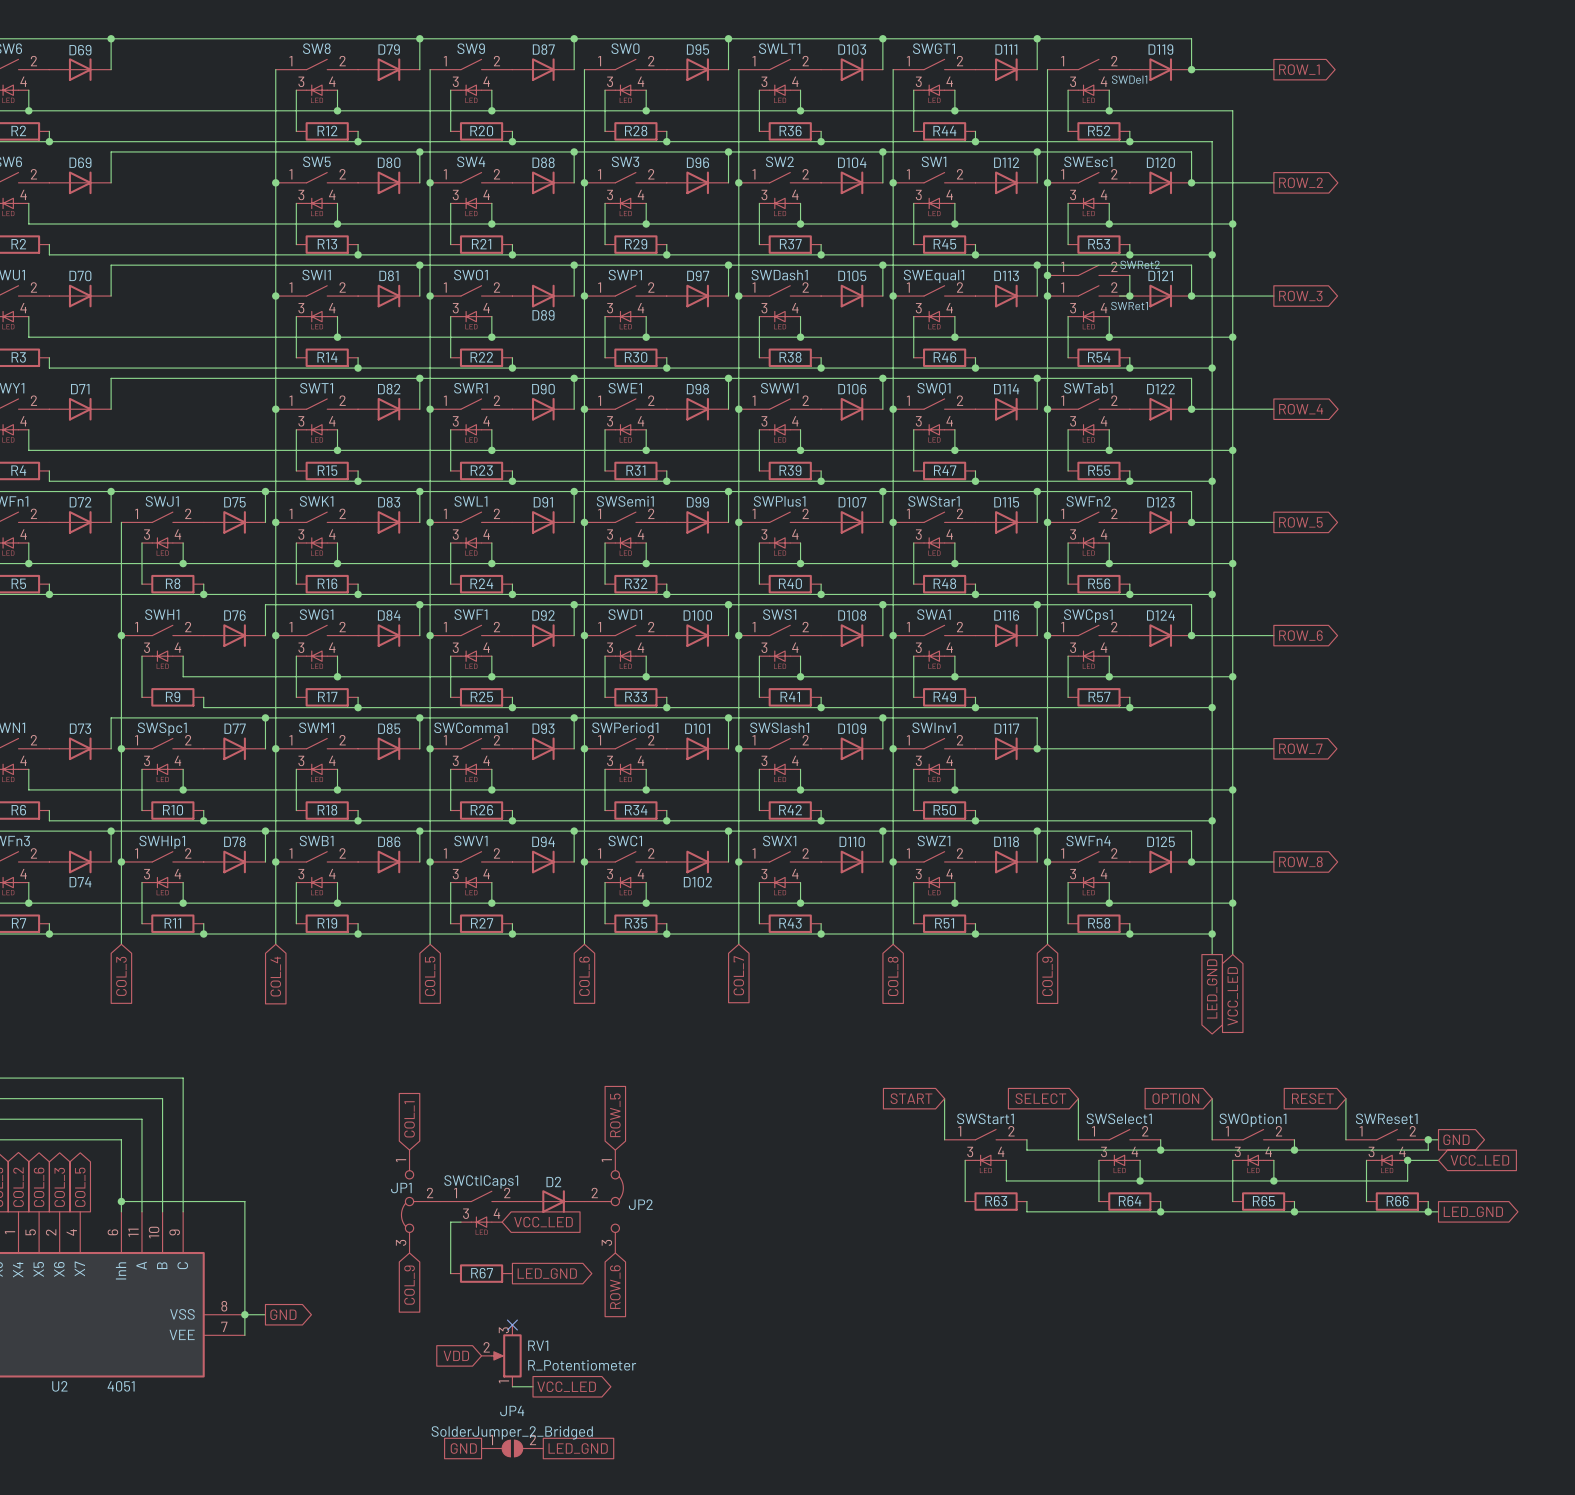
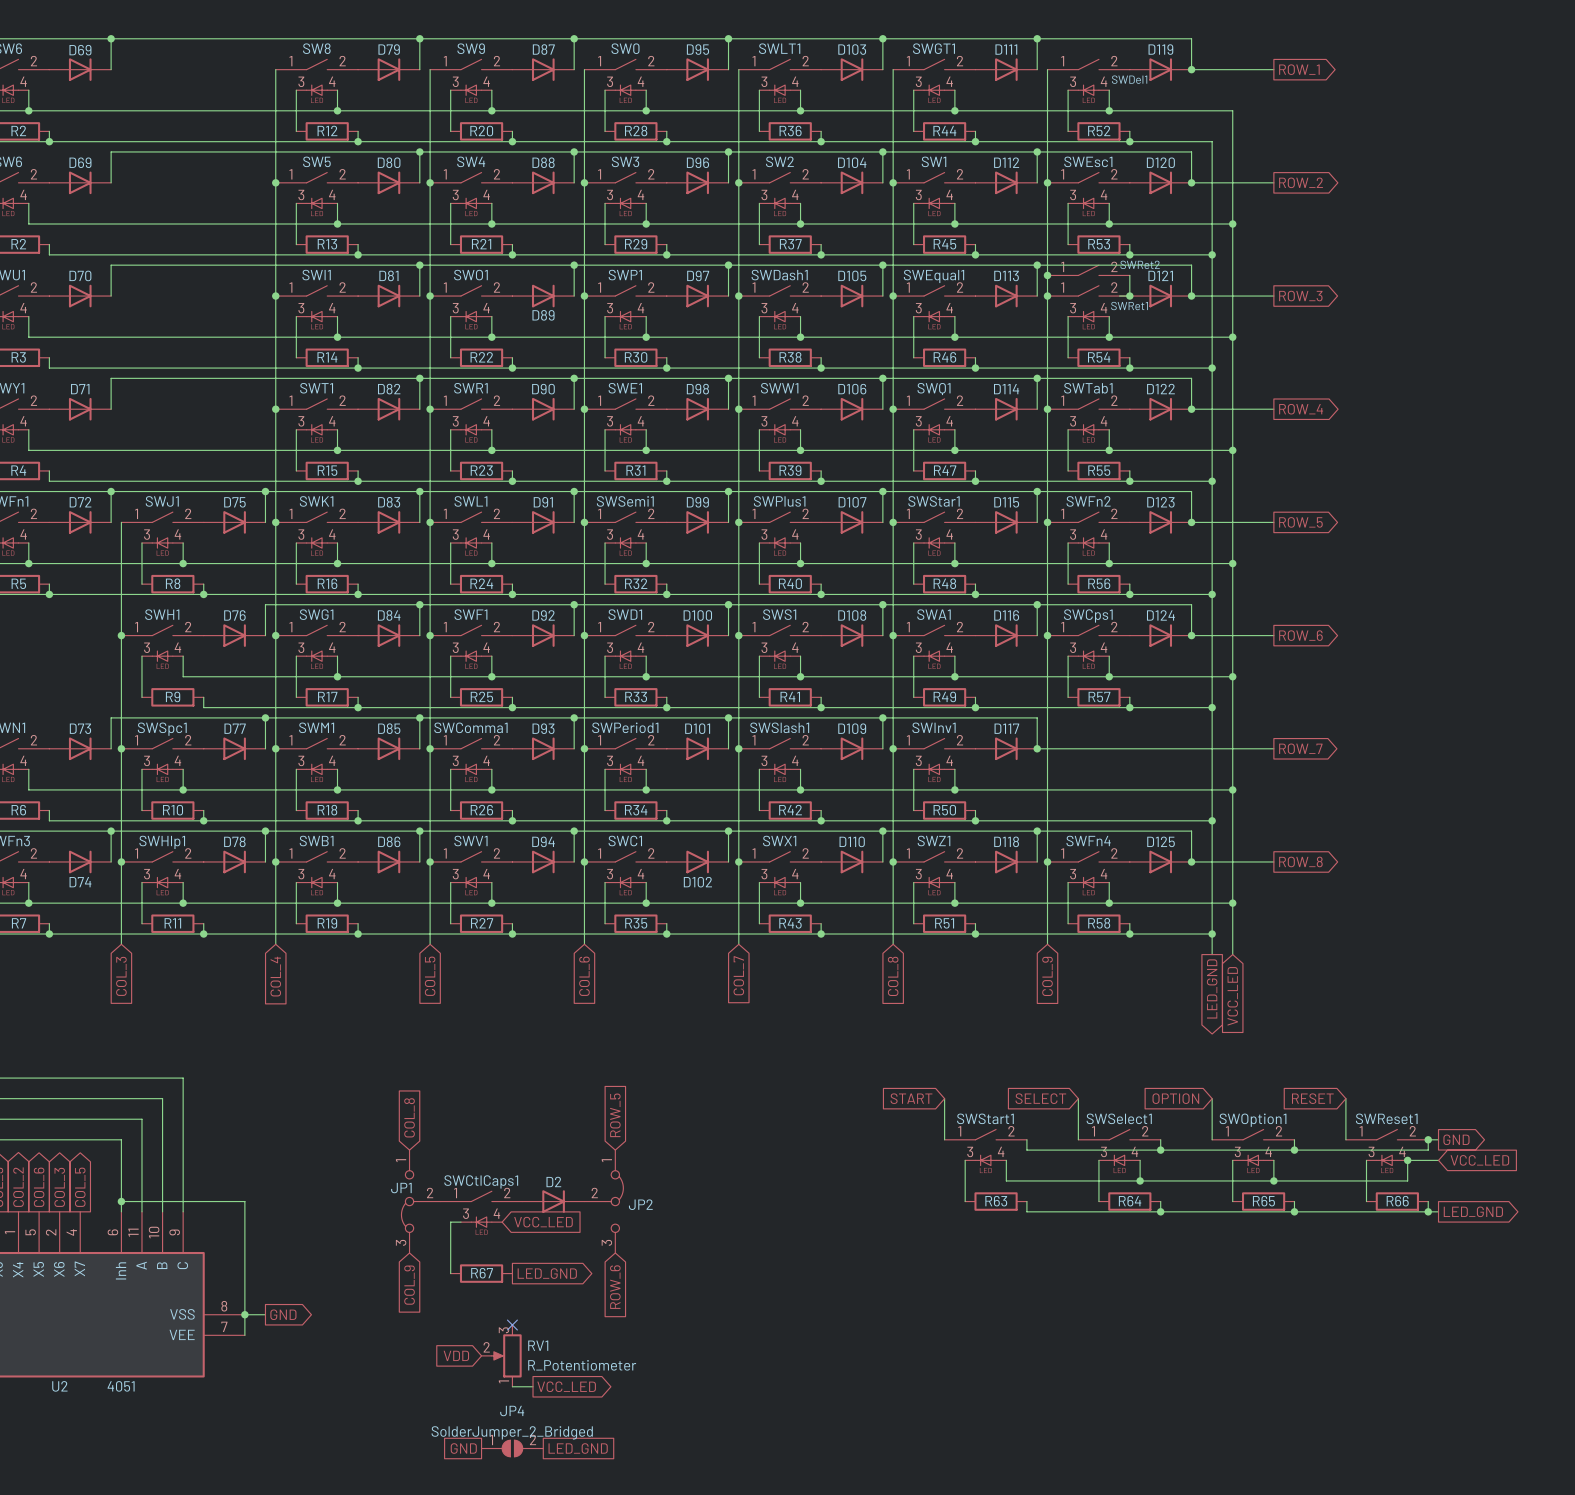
global label: COL_1 (409, 1119) -> COL_8 (409, 1117)

